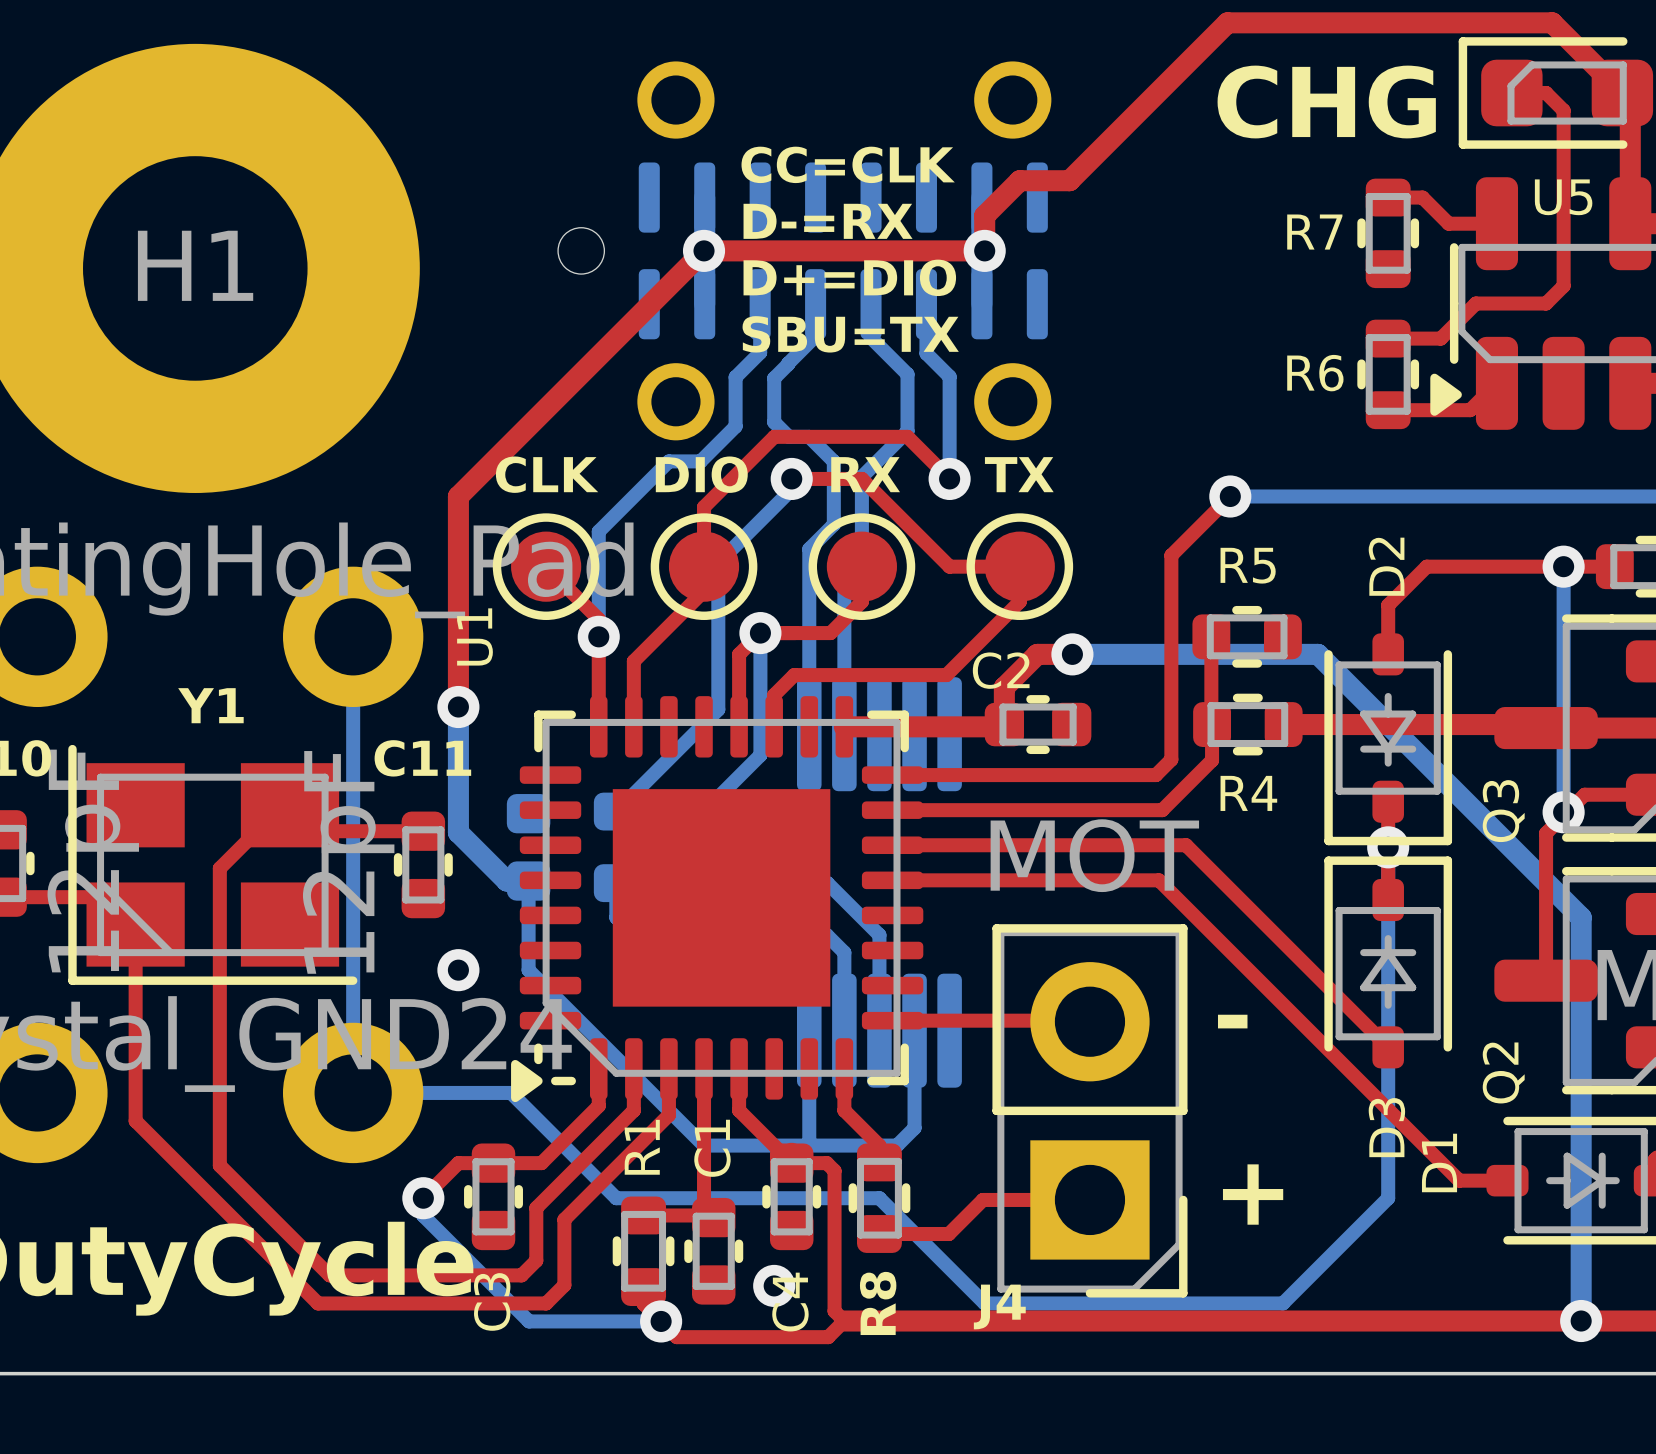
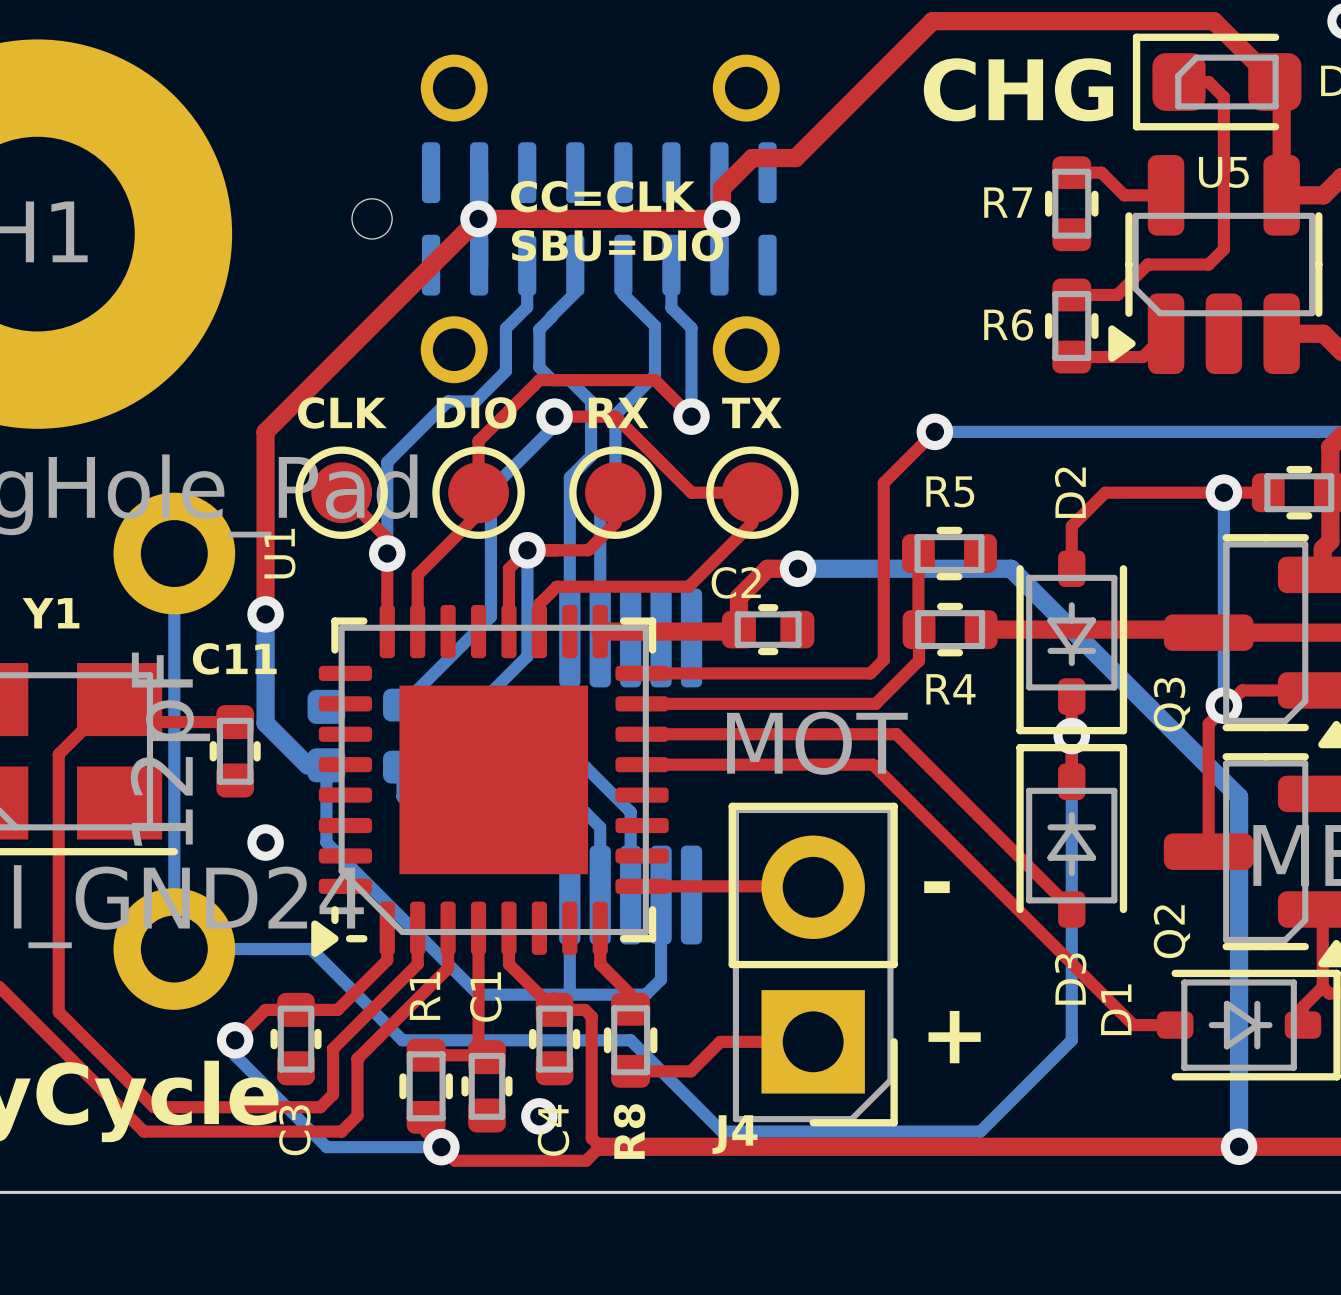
text position: CC=CLK (848, 164) -> CC=CLK (603, 196)
text: D-=RX (828, 221) -> none
text: D+=DIO (849, 277) -> SBU=DIO (617, 245)
text: SBU=TX (850, 334) -> none

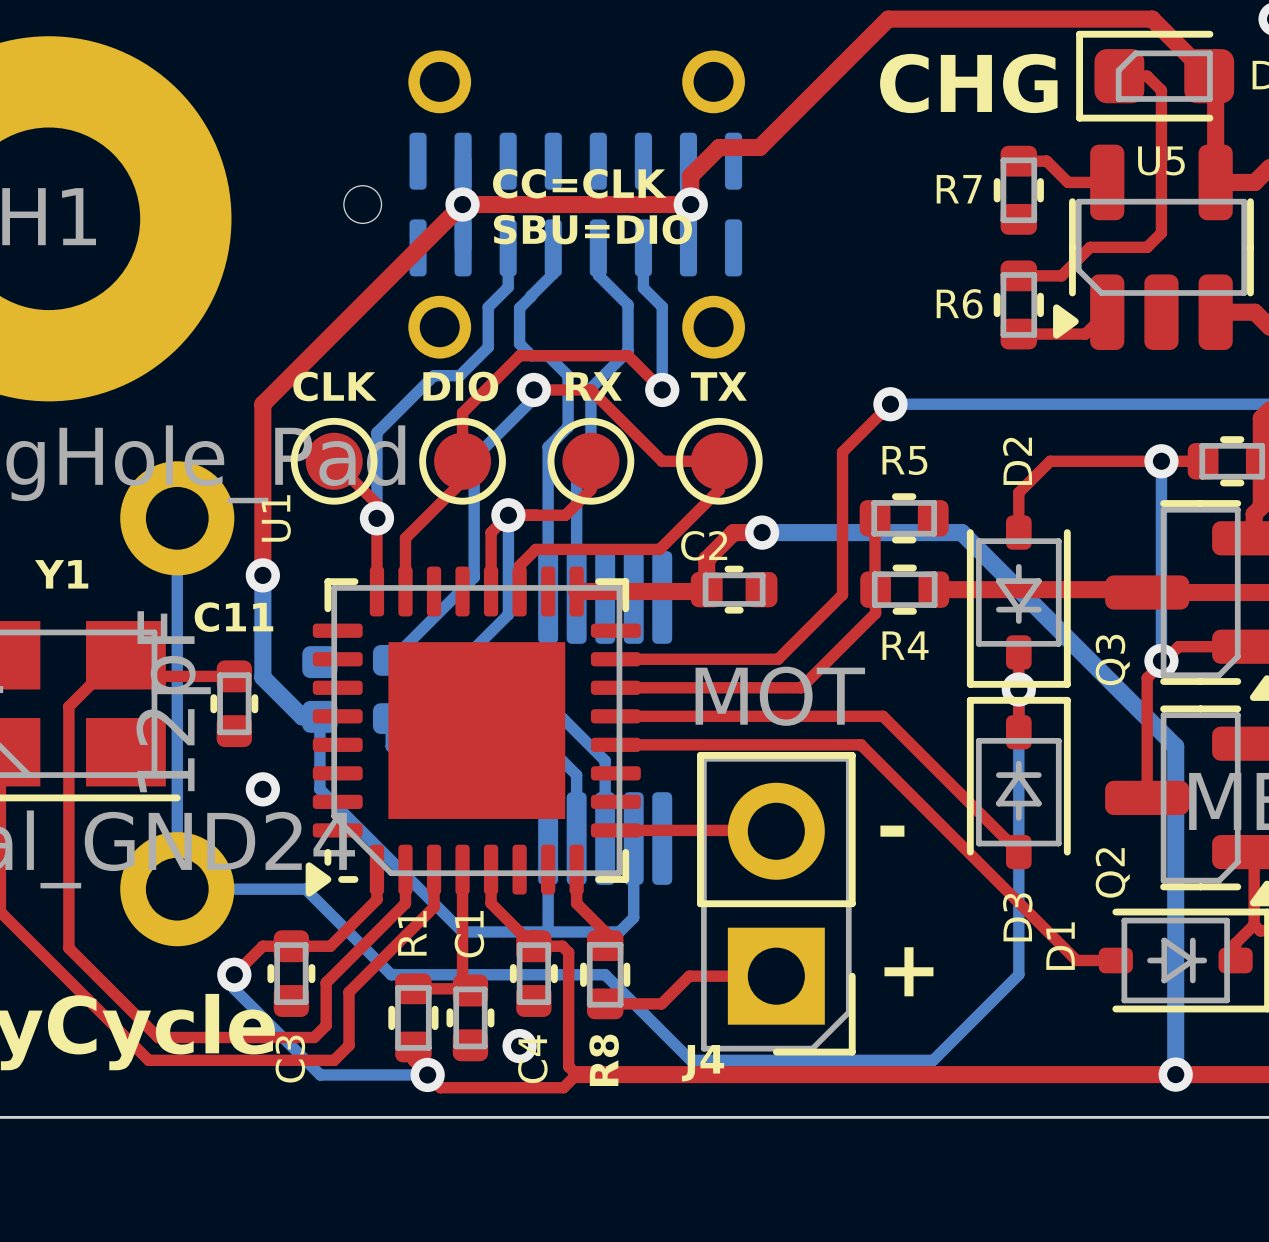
top track: (883, 635) (883, 660) (870, 673) (642, 673) -> (842, 594) (778, 659)
top track: (919, 654) (919, 660) (875, 703) (815, 703) -> (875, 613) (801, 687)
top track: (839, 734) (896, 734) (926, 764) -> none
top track: (873, 764) (903, 795) -> (832, 716) (883, 716)
top track: none -> (615, 744) (860, 744)

